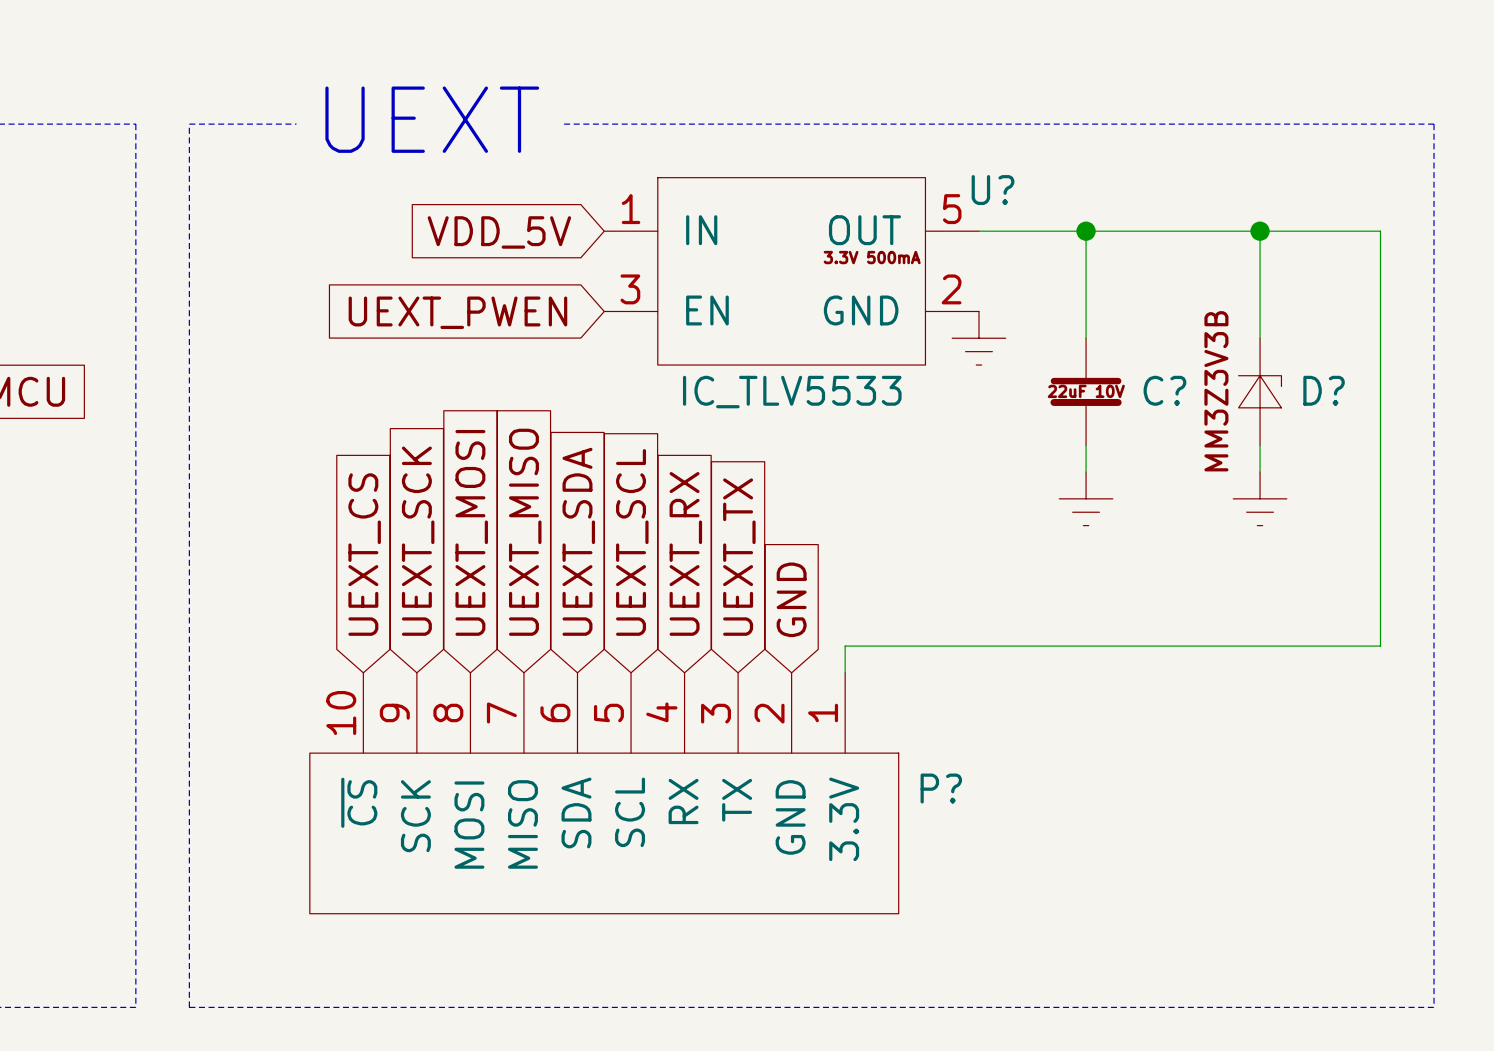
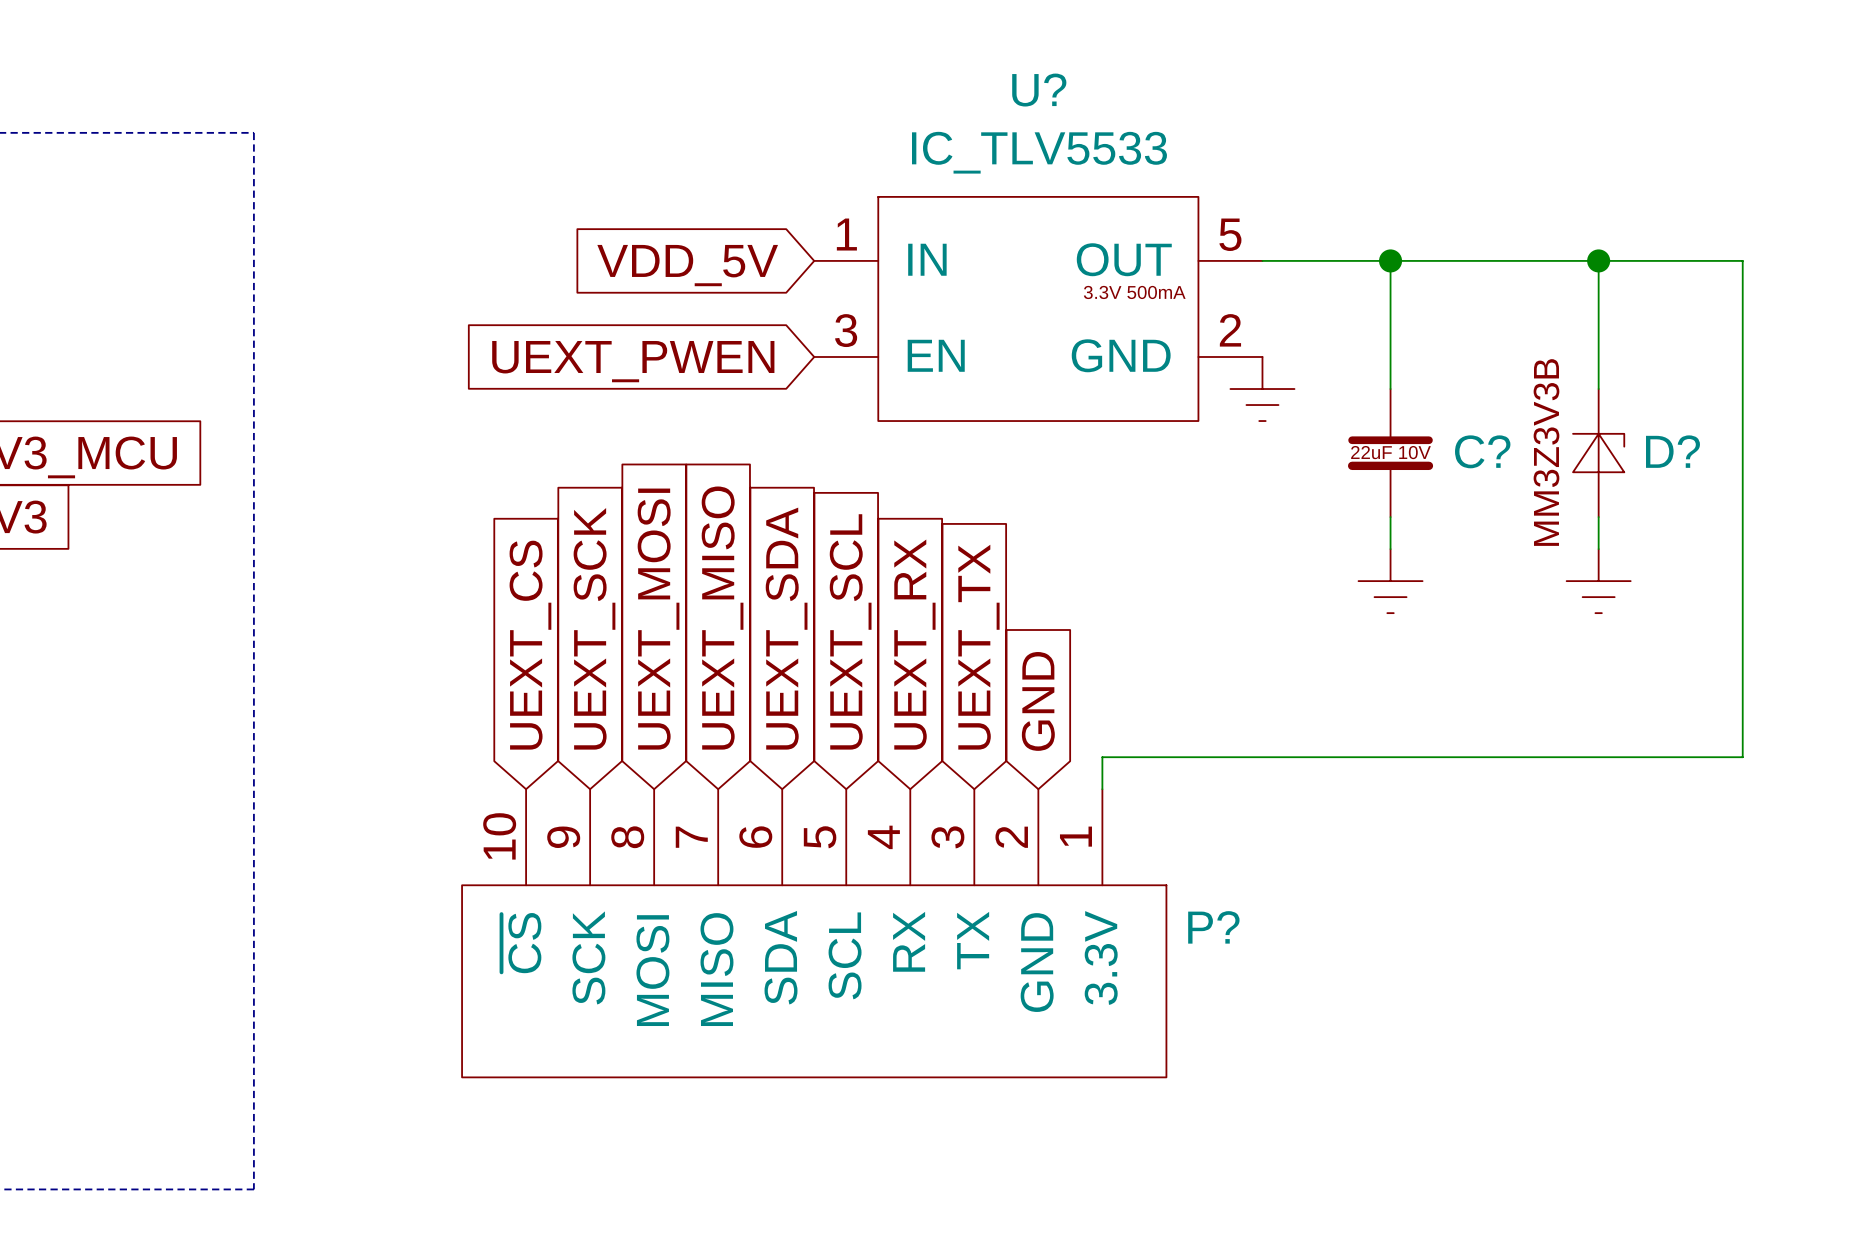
text: UEXT (432, 119) -> none
line: (296, 124) (189, 124) (189, 1007) (1434, 1007) (1434, 124) (564, 124) -> none
U? name position: U? (993, 190) -> U? (1039, 90)
U? value position: IC_TLV5533 (792, 392) -> IC_TLV5533 (1039, 152)

